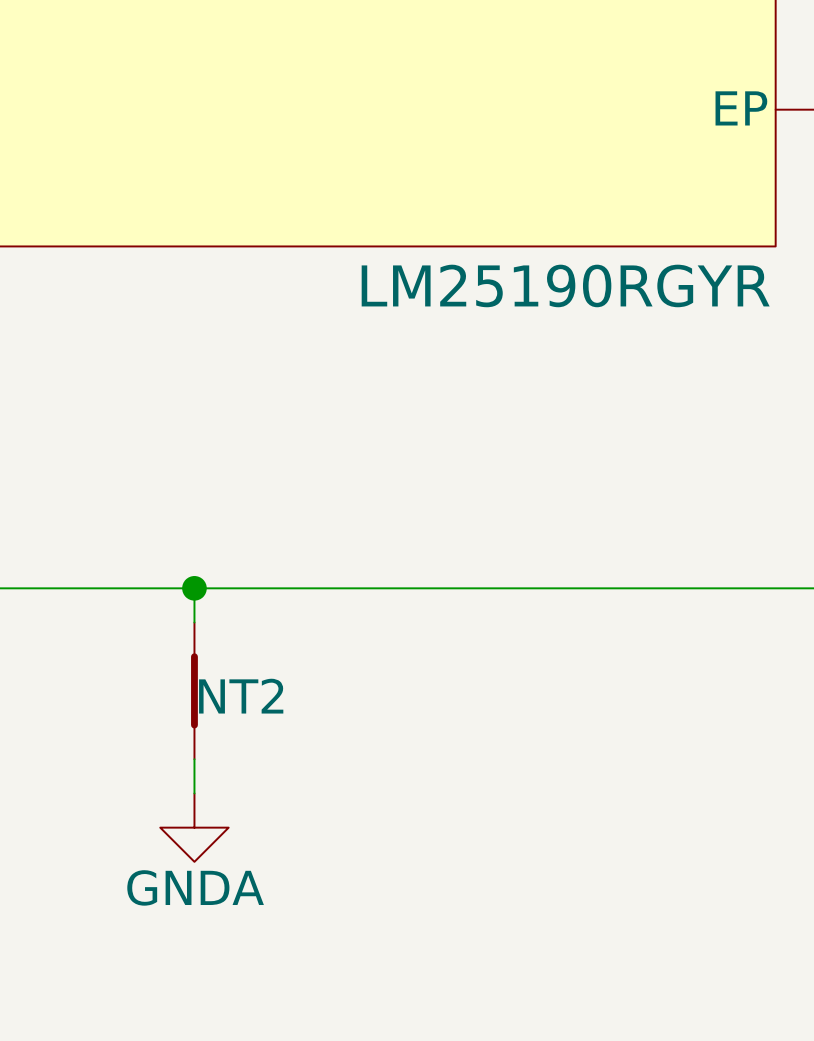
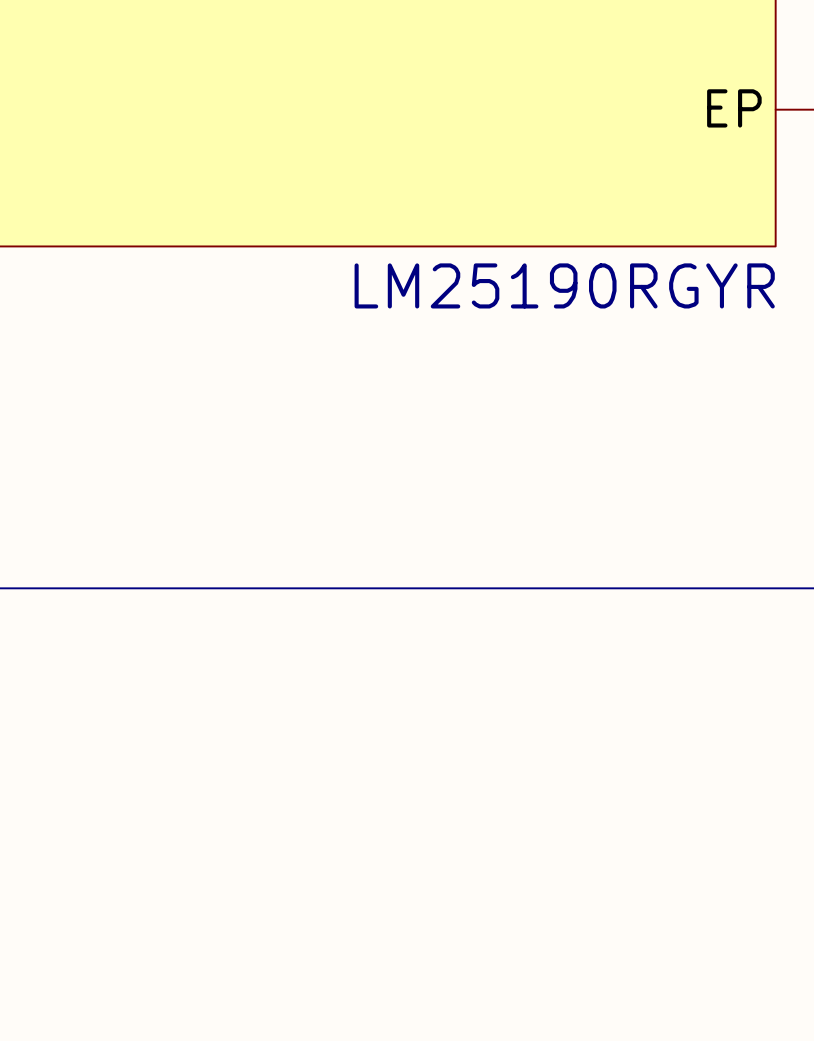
wire: (194, 588) (194, 622) -> none
junction: (194, 588) -> none
NT2: (194, 690) -> none
wire: (194, 759) (194, 793) -> none
power symbol: GNDA (194, 827) -> none

